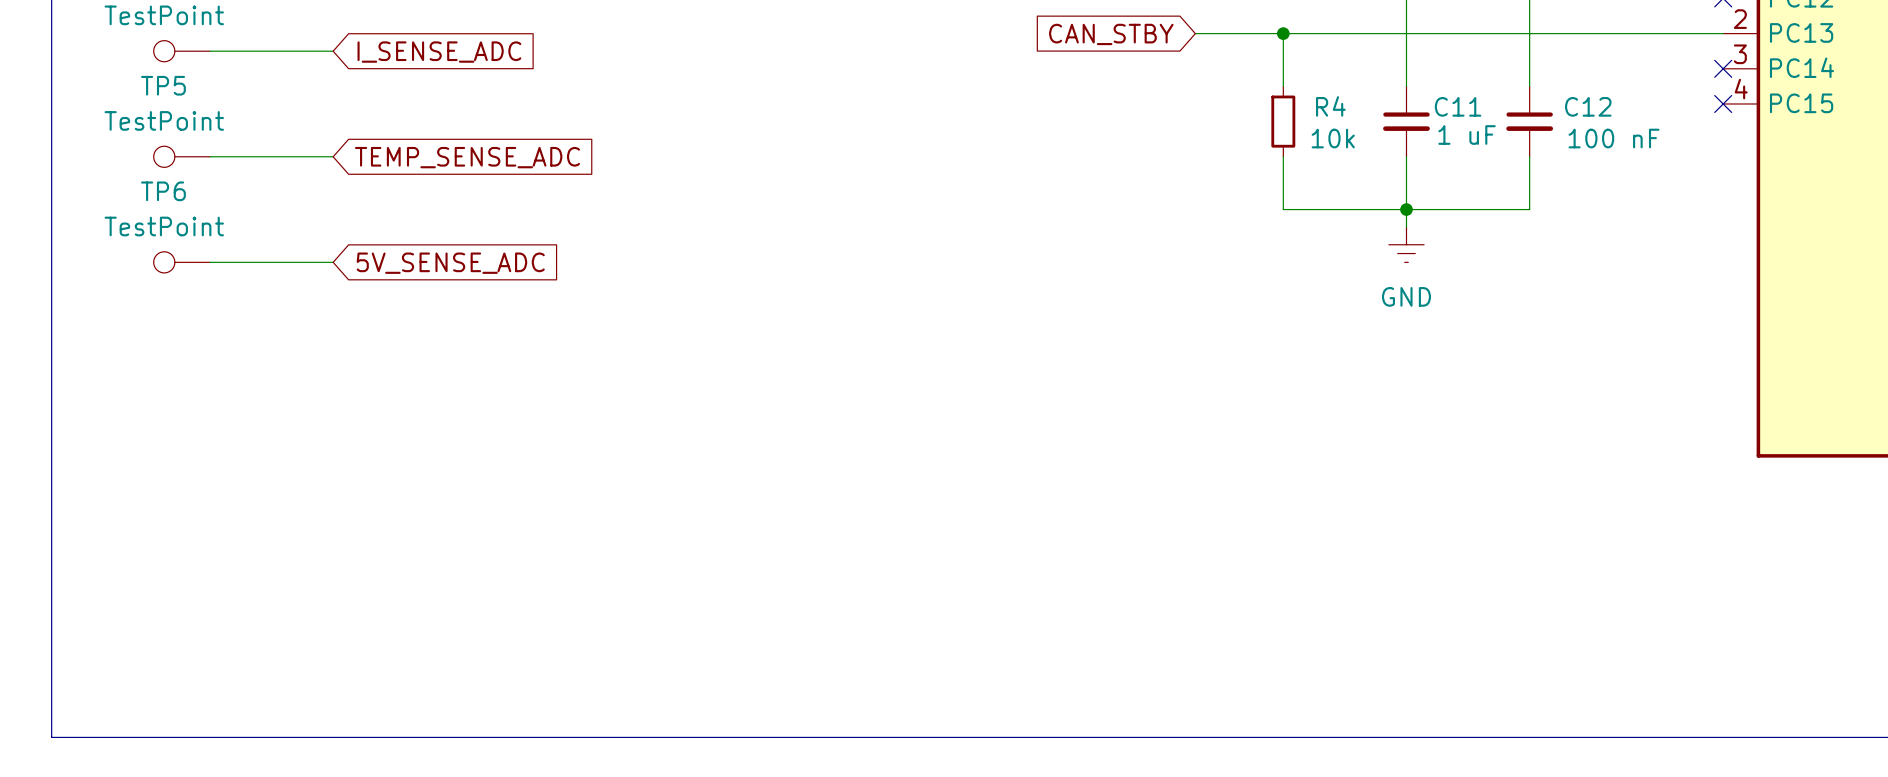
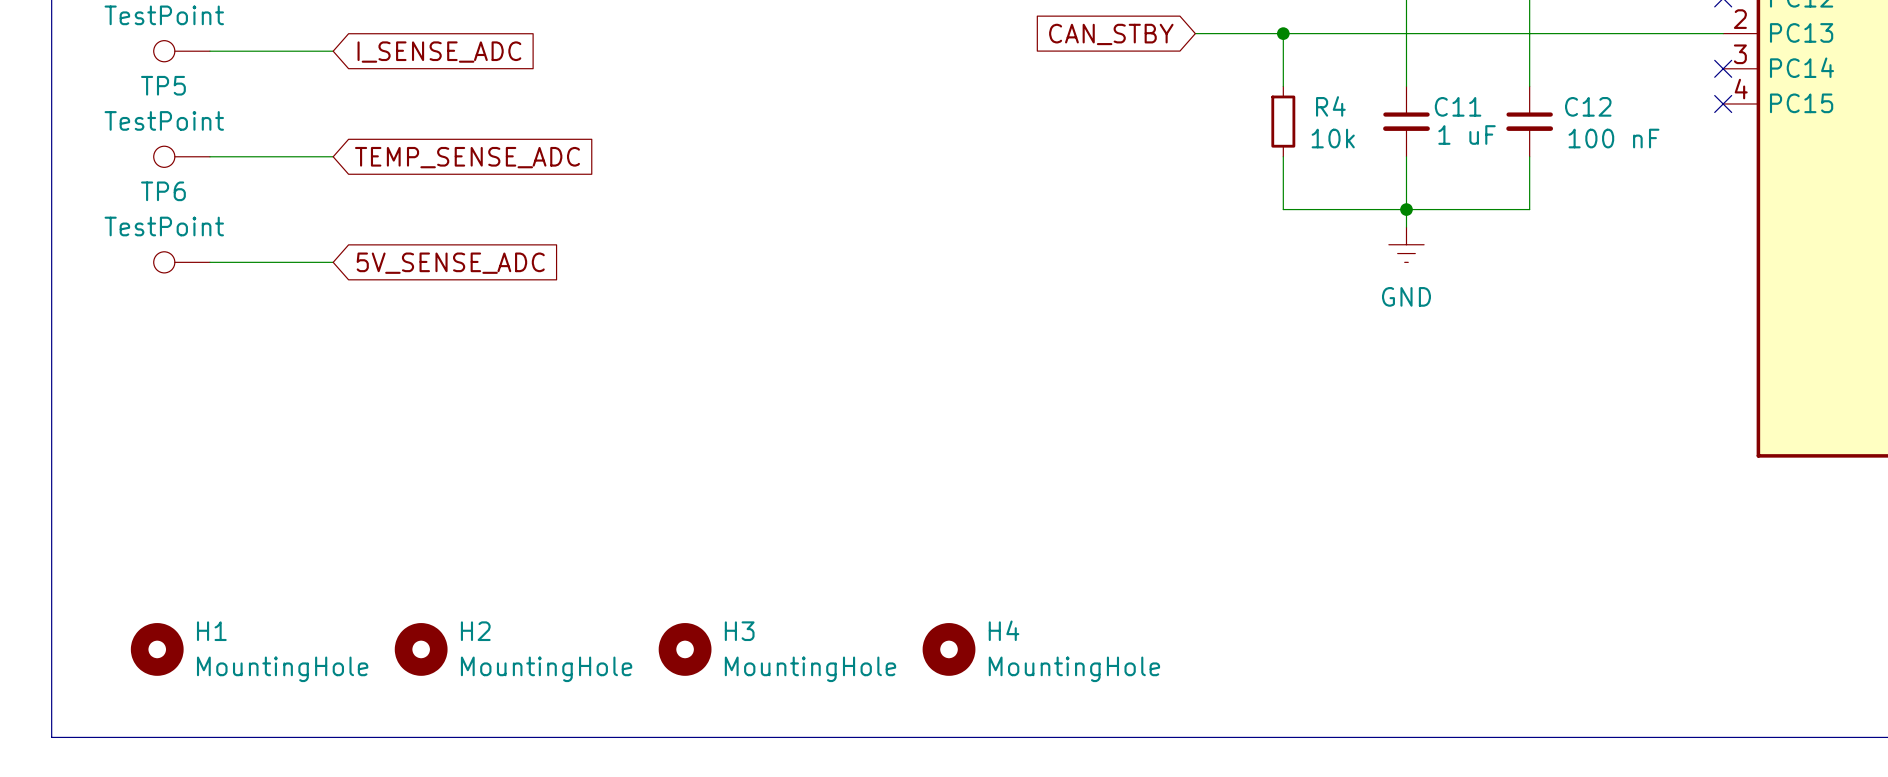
H1: none -> MountingHole (157, 649)
H2: none -> MountingHole (421, 649)
H3: none -> MountingHole (685, 649)
H4: none -> MountingHole (949, 649)

